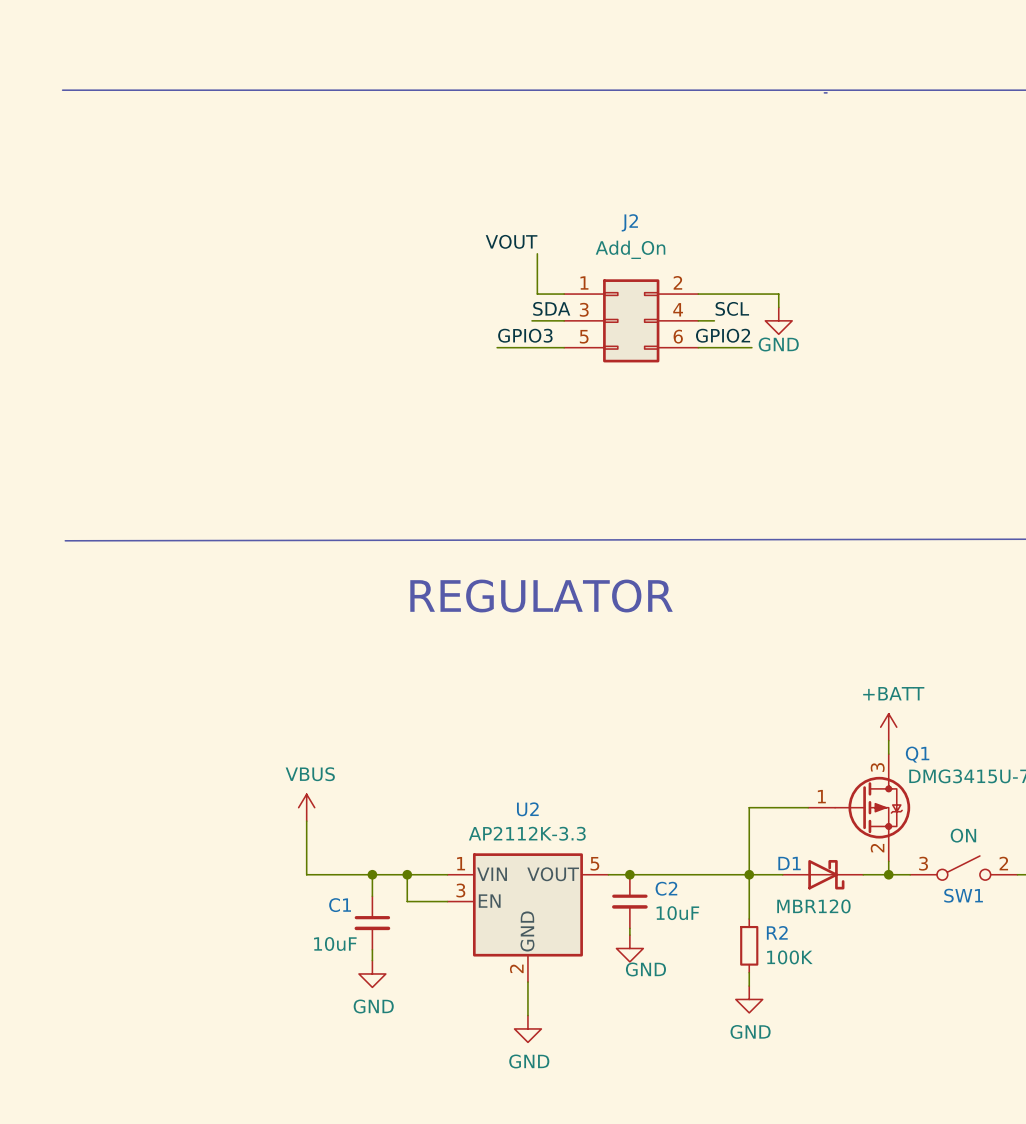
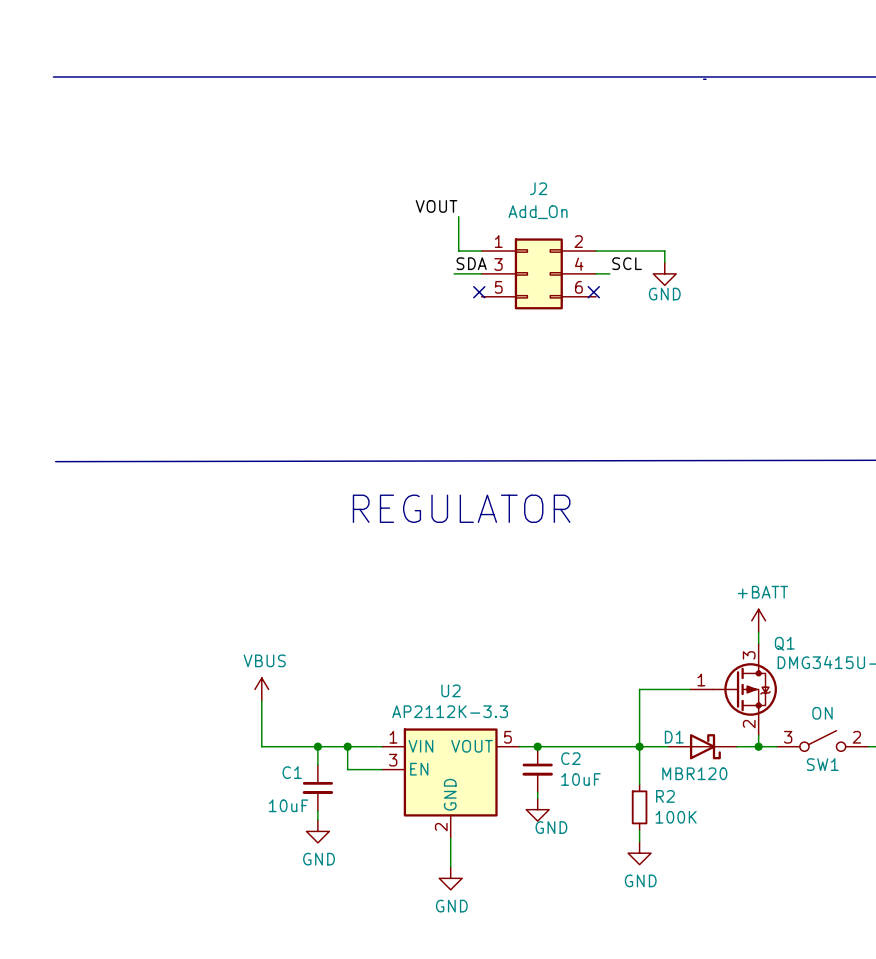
label: GPIO3 (525, 335) -> none
label: GPIO2 (723, 335) -> none
no-connect mark: none -> (479, 292)
no-connect mark: none -> (593, 292)
wire: (497, 347) (564, 347) -> none
wire: (698, 347) (751, 347) -> none

